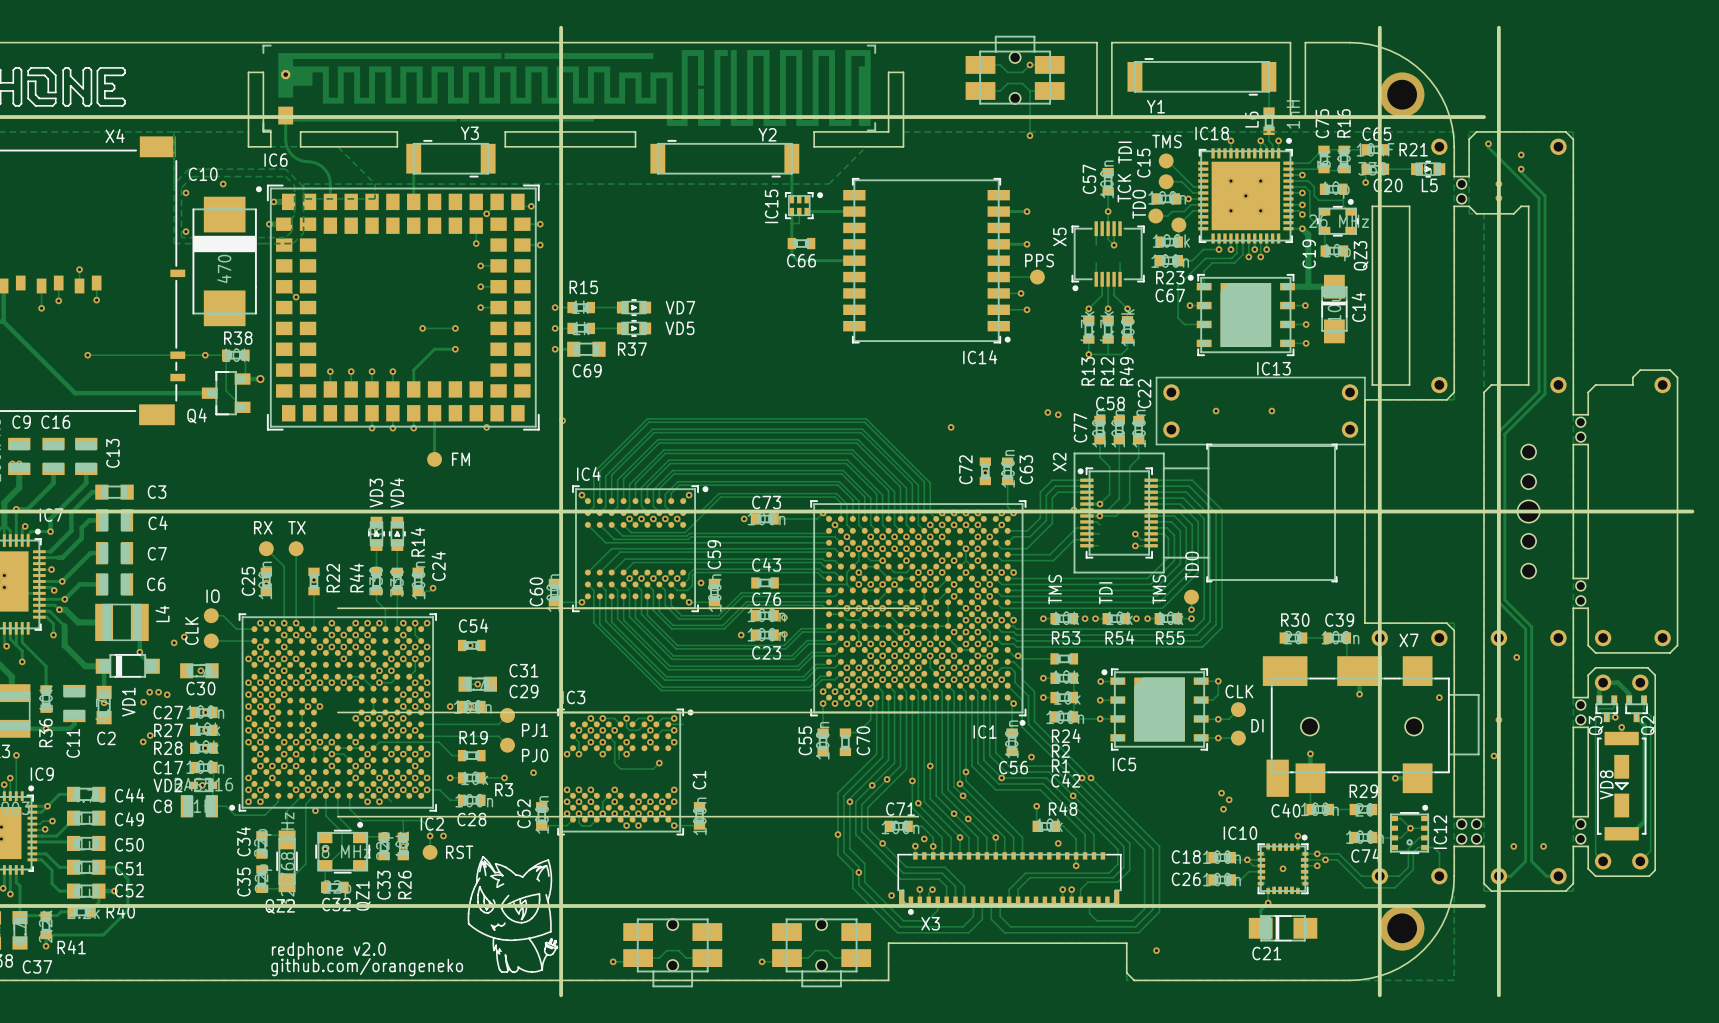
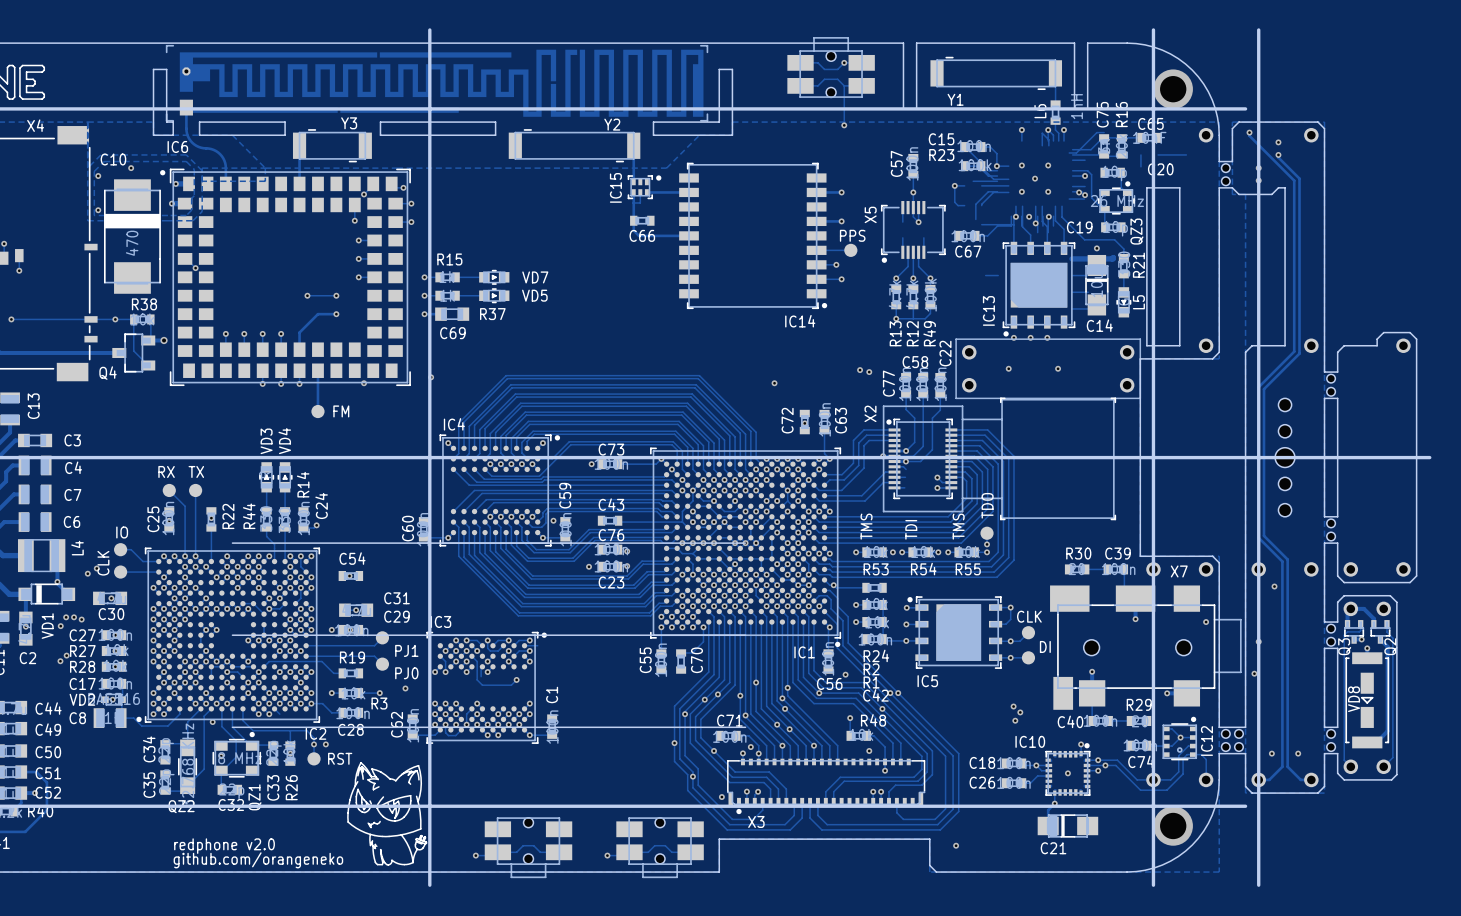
track: none -> (1104, 132) (1096, 132) (1076, 152) (1069, 152)
track: none -> (1042, 145) (1042, 133) (1048, 139) (1048, 145)
part: TMS (1166, 160) -> none
track: none -> (981, 147) (990, 147) (996, 153) (996, 166) (1008, 166)
C15 name rotation: 0° (1143, 163) -> 90° clockwise (941, 139)
R21 rotation: 0° (1375, 169) -> 90° clockwise (1123, 266)
R21 position: (1375, 169) -> (1123, 266)
L5 rotation: 0° (1428, 169) -> 90° clockwise (1123, 302)
L5 position: (1428, 169) -> (1123, 302)
via: (1302, 175) -> none
part: TDI (1166, 181) -> none
track: none -> (981, 166) (993, 179) (1008, 179)
via: none -> (996, 166)
track: (1288, 181) (1308, 181) (1314, 187) (1314, 195) (1318, 200) (1343, 200) -> none
via: (1365, 182) -> none
IC18: (1245, 190) -> none
C15 position: (1166, 198) -> (973, 147)
via: (1188, 198) -> none
via: none -> (954, 185)
track: none -> (964, 185) (954, 185) (954, 202) (958, 205) (964, 205)
track: none -> (981, 185) (1008, 185)
track: (1203, 204) (1190, 204) (1184, 211) (1172, 211) (1167, 216) (1155, 216) -> none
via: (1302, 204) -> none
track: none -> (1008, 192) (993, 192) (981, 205)
via: none -> (1079, 192)
part: TCK (1155, 216) -> none
track: none -> (1069, 199) (1084, 199)
part: TDO (1178, 224) -> none
track: none -> (1015, 206) (1013, 248)
track: none -> (1022, 206) (1022, 226) (1030, 235) (1030, 248)
track: none -> (1035, 206) (1035, 223)
track: none -> (1042, 206) (1042, 221) (1047, 226) (1047, 248)
track: none -> (1055, 206) (1055, 220) (1064, 229) (1064, 248)
track: none -> (1062, 206) (1062, 217) (1084, 239) (1114, 239) (1123, 249) (1123, 257)
track: (1288, 228) (1302, 228) (1308, 234) (1308, 286) -> none
via: (1302, 228) -> none
track: (1236, 238) (1236, 253) (1231, 258) (1205, 258) (1178, 285) (1178, 318) (1184, 324) (1204, 324) -> none
track: (1242, 238) (1242, 254) (1234, 262) (1212, 262) (1204, 271) (1204, 286) -> none
via: none -> (1015, 216)
via: none -> (1029, 216)
via: none -> (1048, 216)
R23 position: (1169, 242) -> (973, 166)
via: none -> (1035, 223)
track: none -> (981, 224) (1013, 224)
via: (1219, 249) -> none
via: (1230, 249) -> none
via: (1254, 249) -> none
via: (1266, 249) -> none
C19 name rotation: 0° (1309, 254) -> 90° clockwise (1079, 227)
via: (1248, 256) -> none
via: (1260, 256) -> none
via: none -> (1096, 248)
R23 name position: R23 (1170, 277) -> R23 (941, 155)
C67 name position: C67 (1170, 295) -> C67 (968, 251)
track: none -> (1123, 274) (1123, 292)
via: (1190, 305) -> none
via: (1305, 305) -> none
C14 name rotation: 0° (1358, 307) -> 90° clockwise (1099, 325)
C14 name position: C14 (1358, 307) -> C14 (1099, 325)
C14 position: (1334, 309) -> (1096, 285)
IC13 rotation: 0° (1241, 315) -> 90° counterclockwise (1038, 289)
via: (1306, 324) -> none
via: (1306, 343) -> none
IC13 name position: IC13 (1273, 368) -> IC13 (988, 310)
via: none -> (1013, 337)
via: none -> (1030, 337)
via: none -> (1047, 337)

